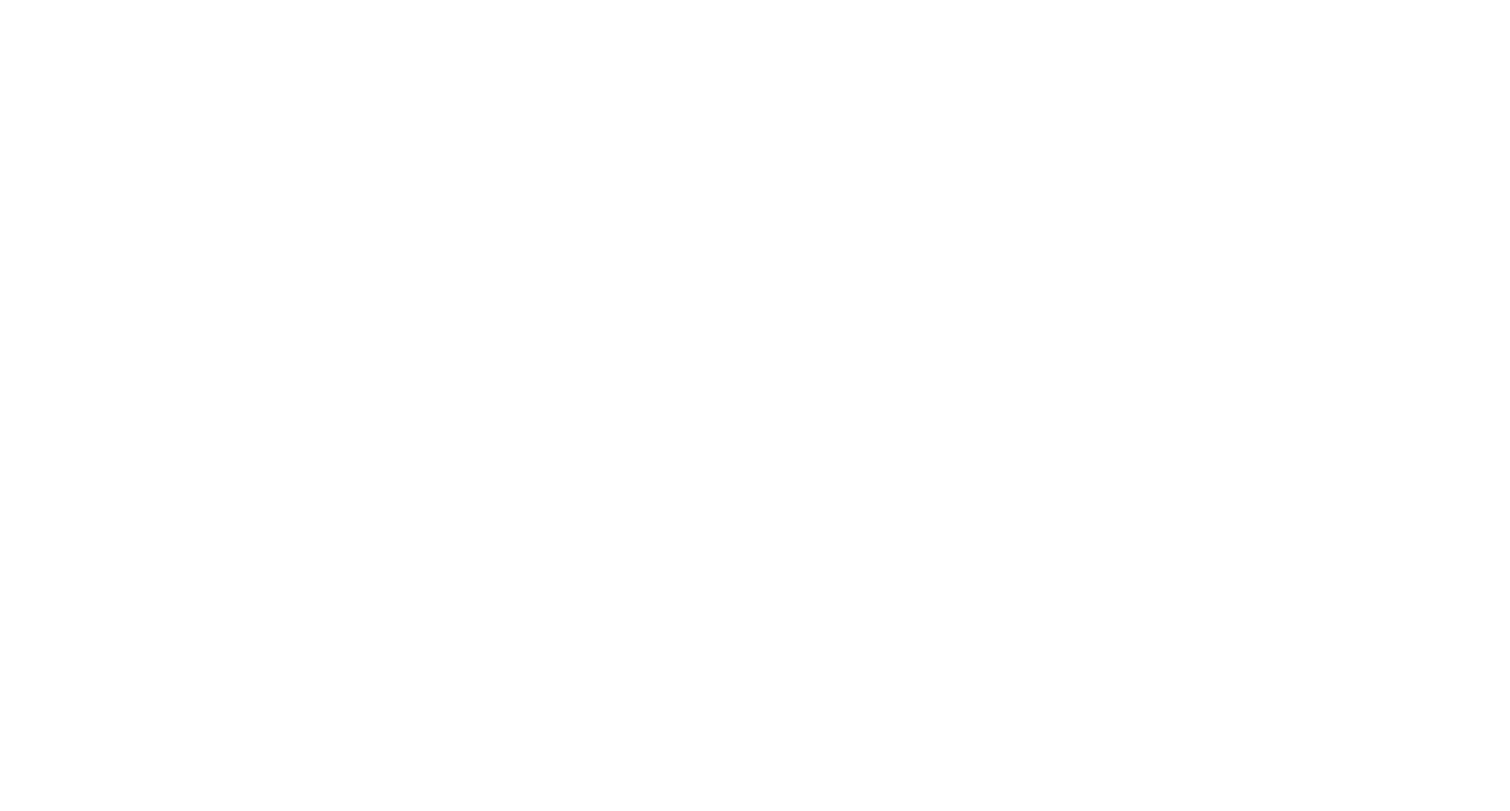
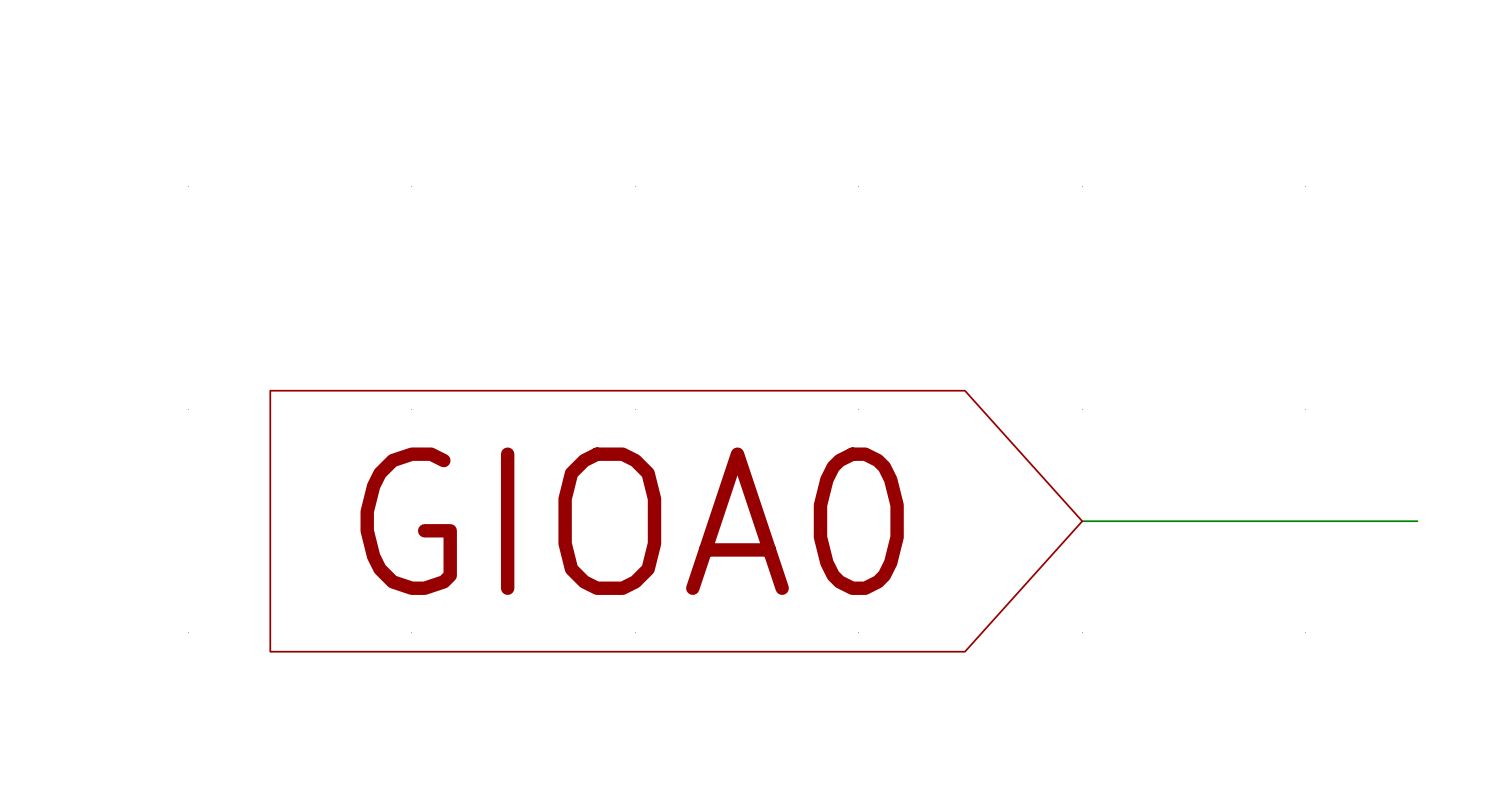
global label: none -> GIOA0 (632, 521)
wire: none -> (1082, 521) (1417, 521)

